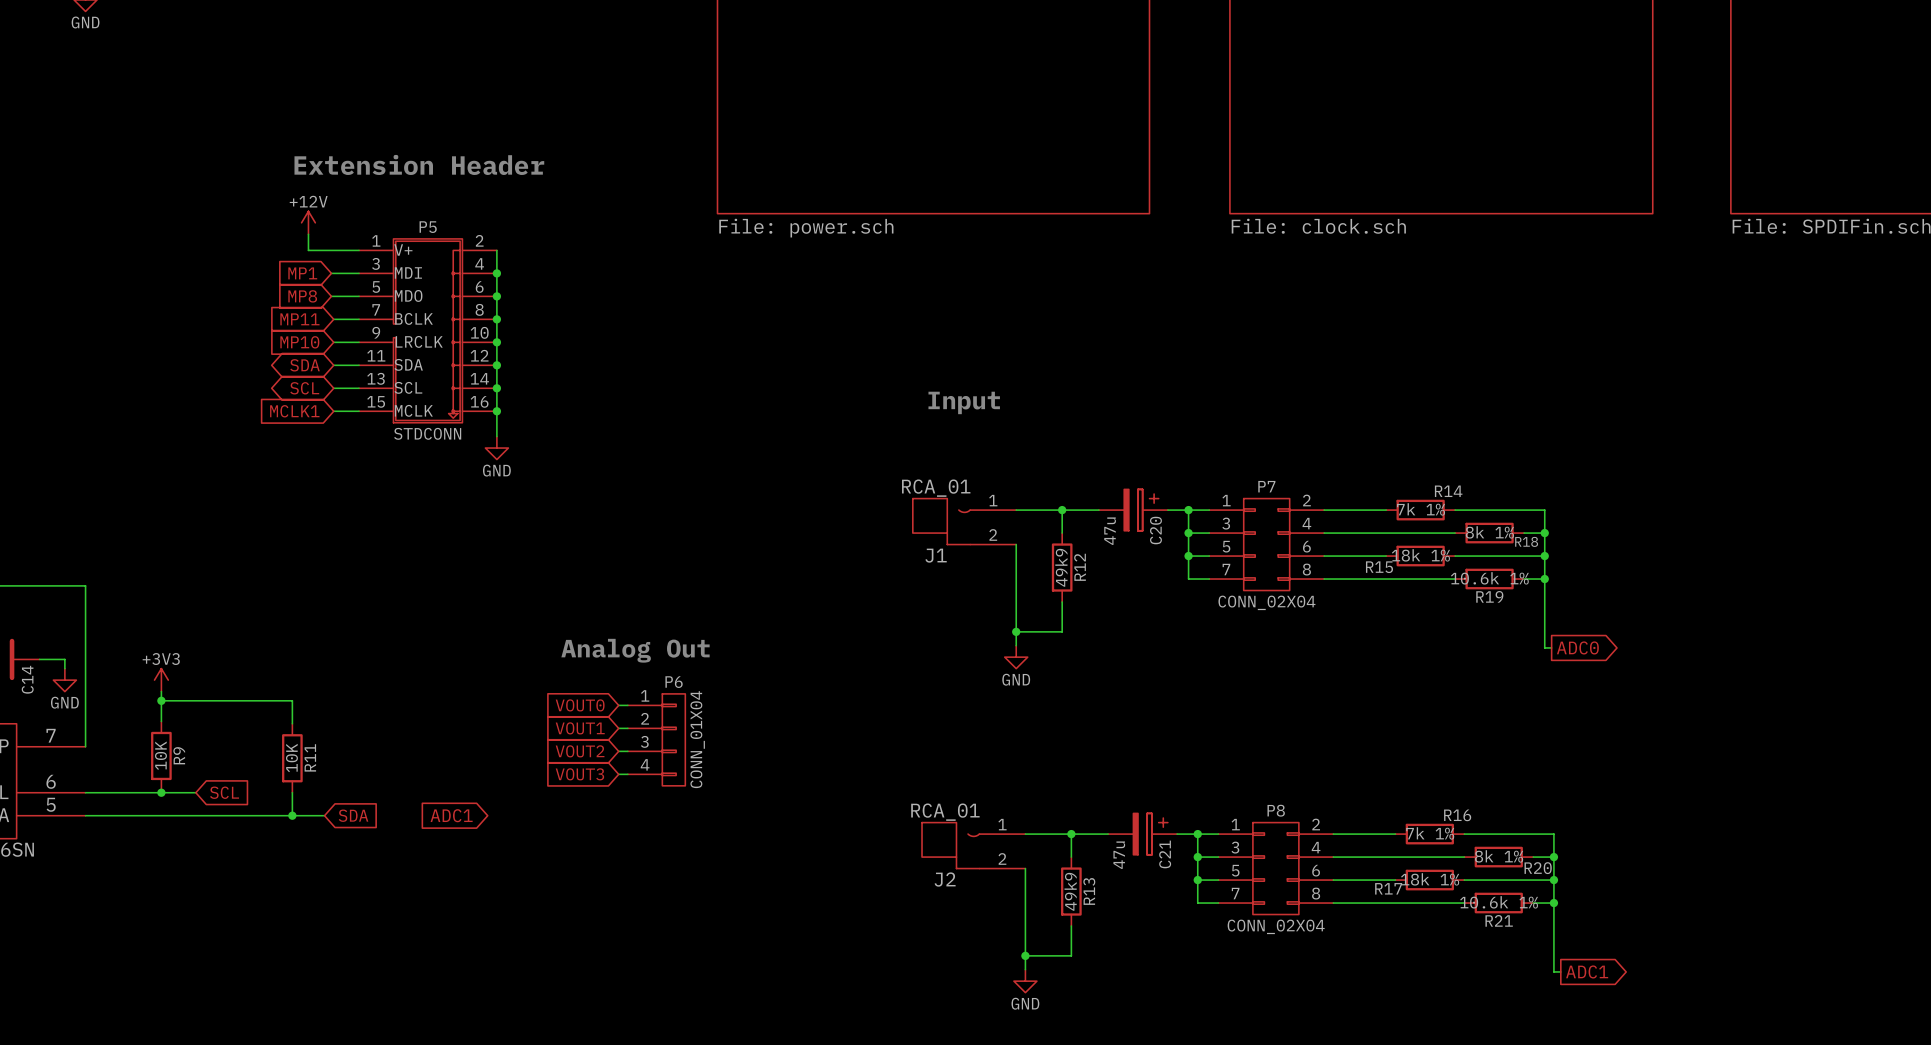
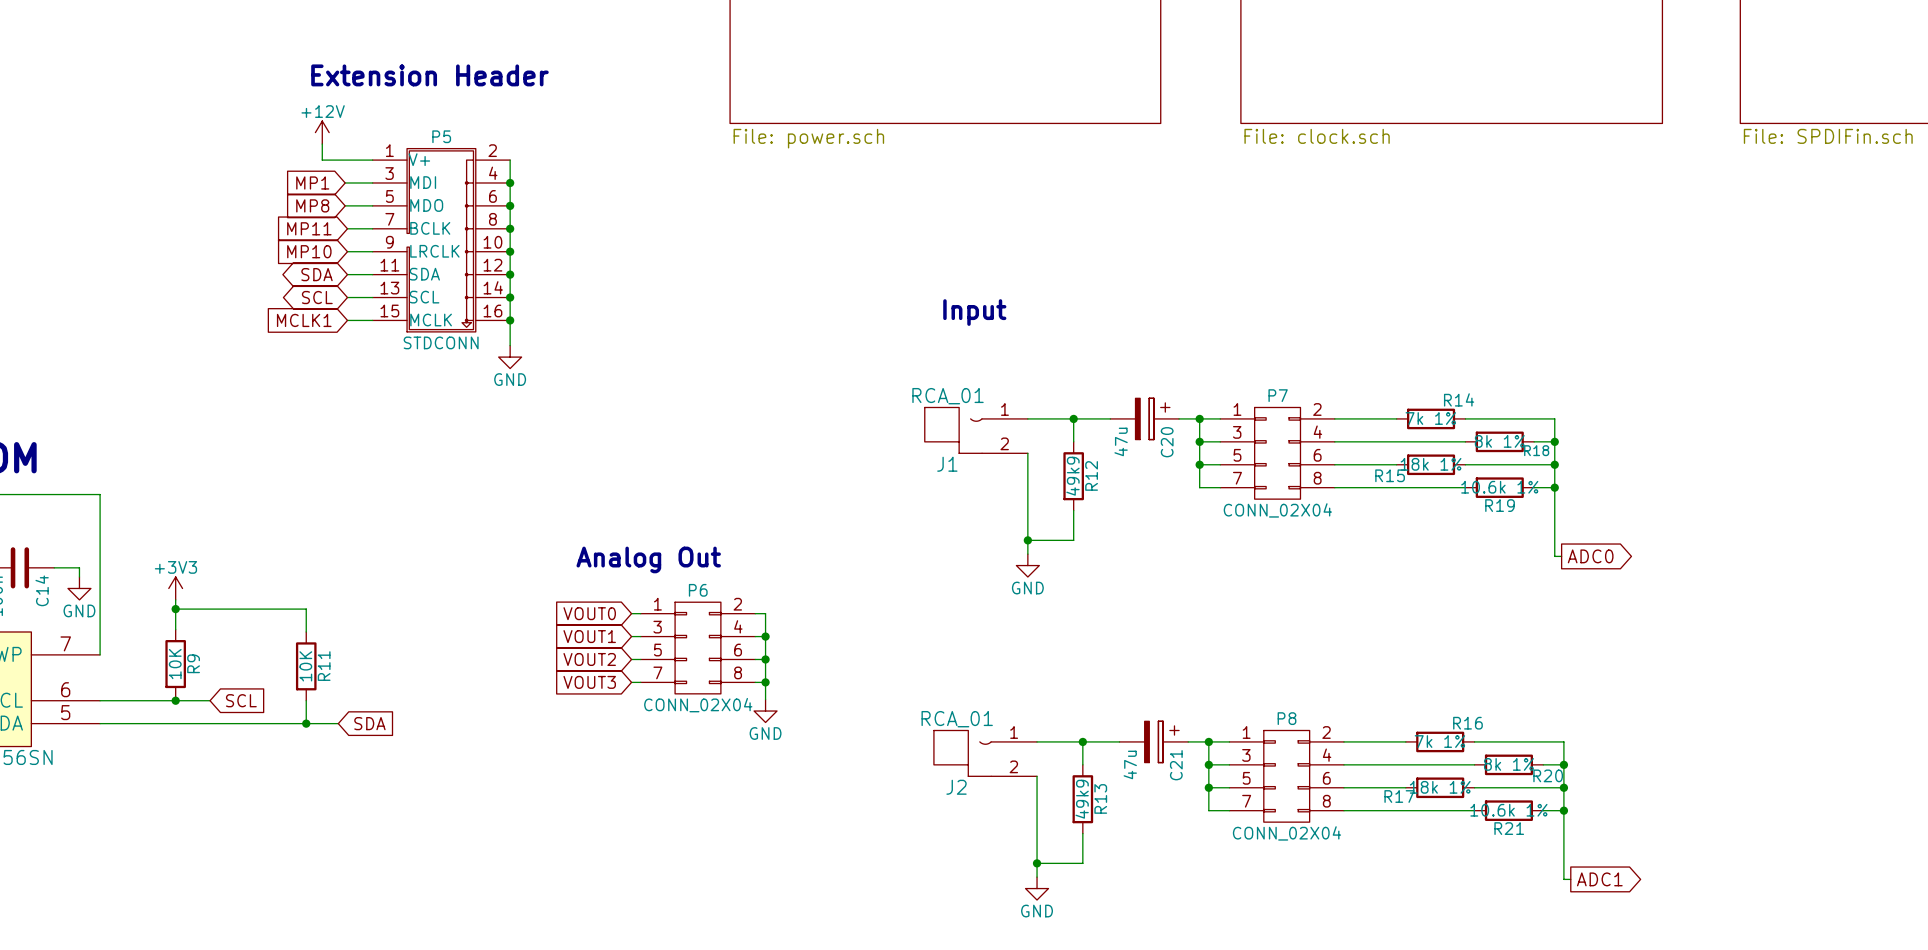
P6 symbol: [627, 693, 686, 786] -> [640, 602, 756, 694]
wire: none -> (755, 613) (765, 613) (765, 699)
wire: none -> (755, 636) (765, 636)
junction: none -> (765, 636)
P6 value: CONN_01X04 (697, 739) -> CONN_02X04 (698, 705)
wire: none -> (755, 659) (765, 659)
junction: none -> (765, 659)
wire: none -> (755, 682) (765, 682)
junction: none -> (765, 682)
power symbol: none -> GND (765, 711)
global label: ADC1 (451, 815) -> none

